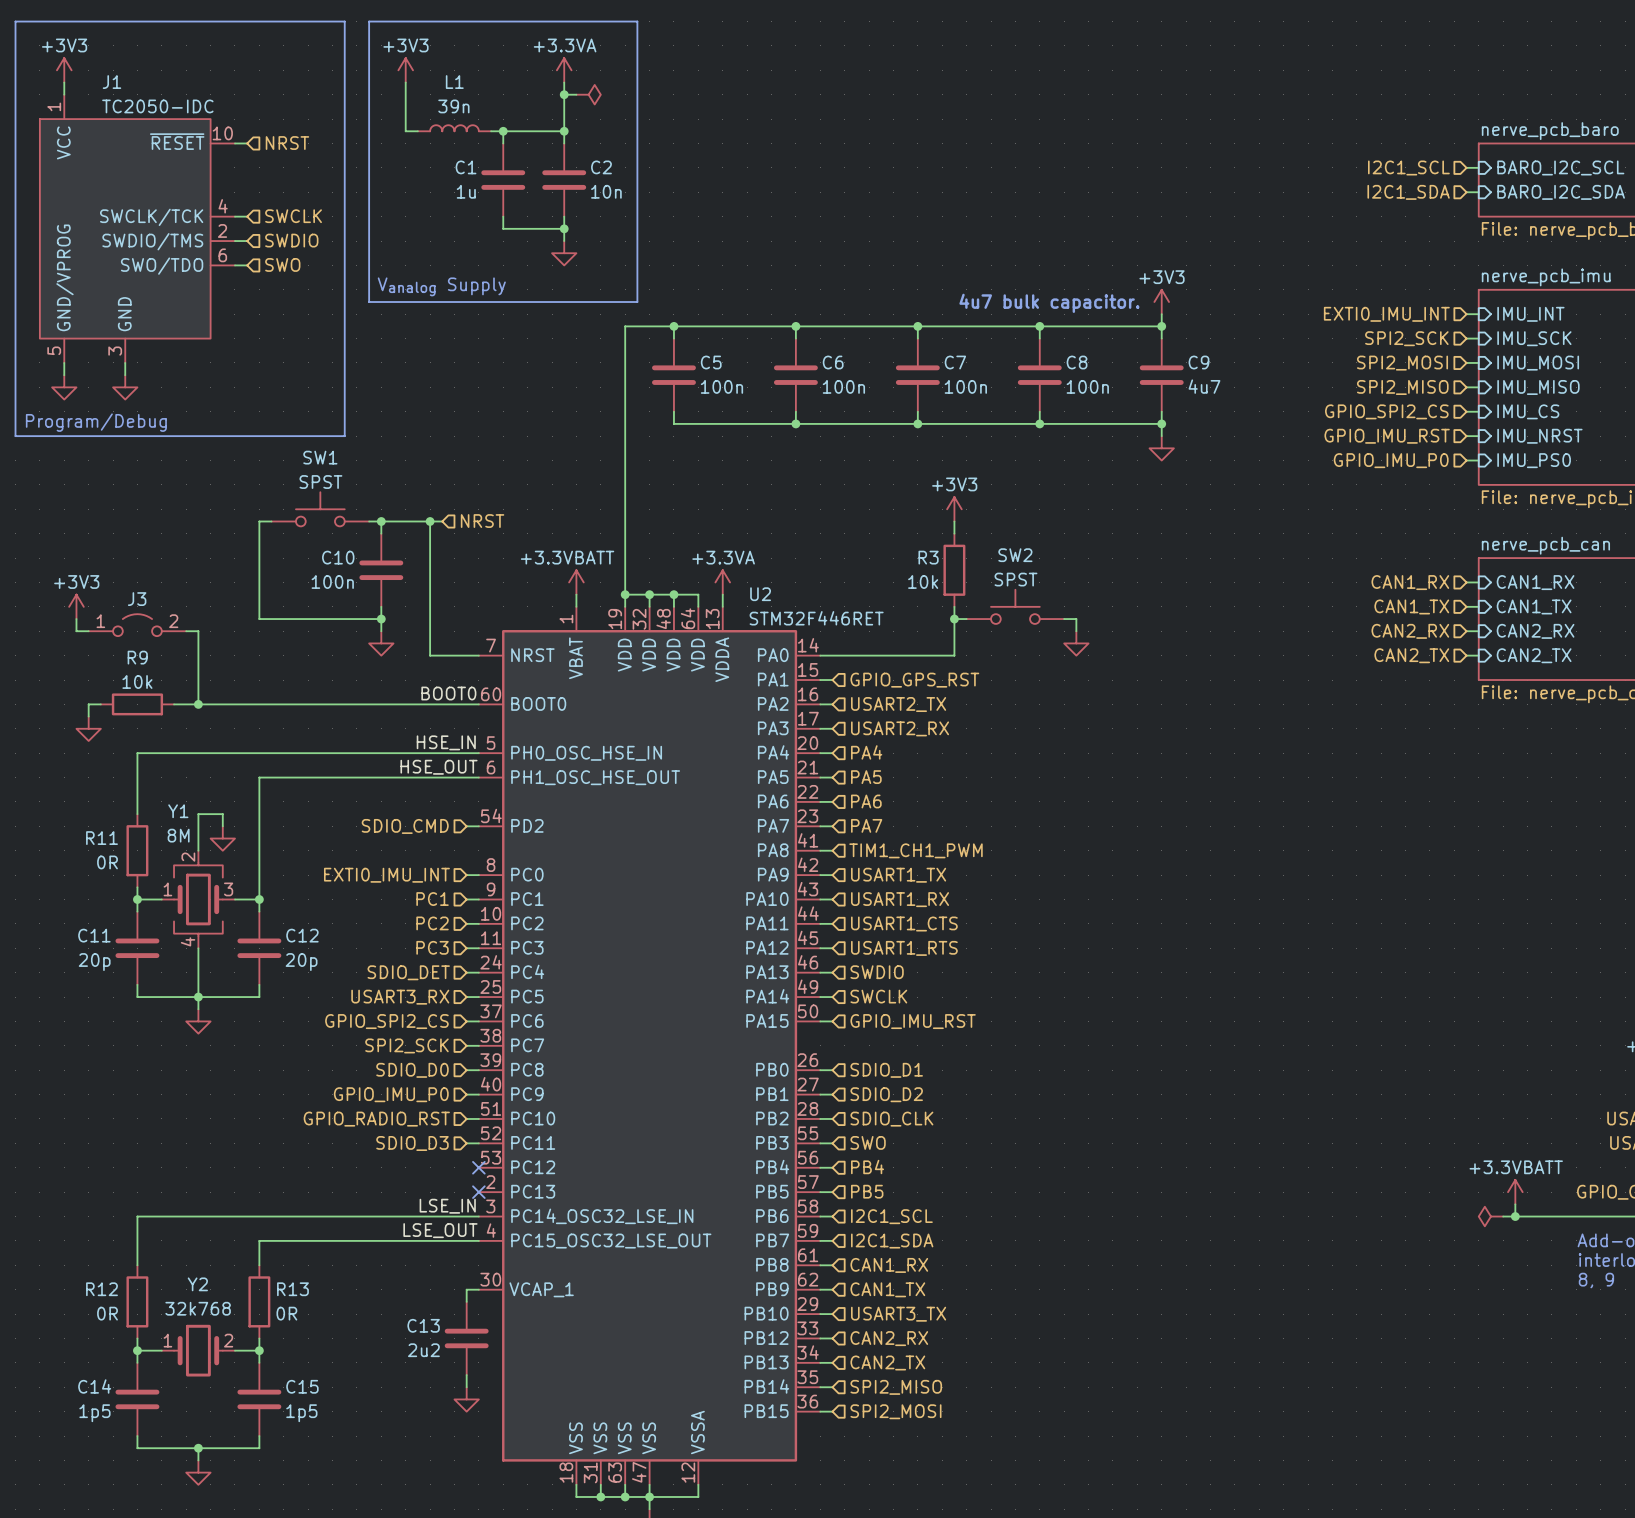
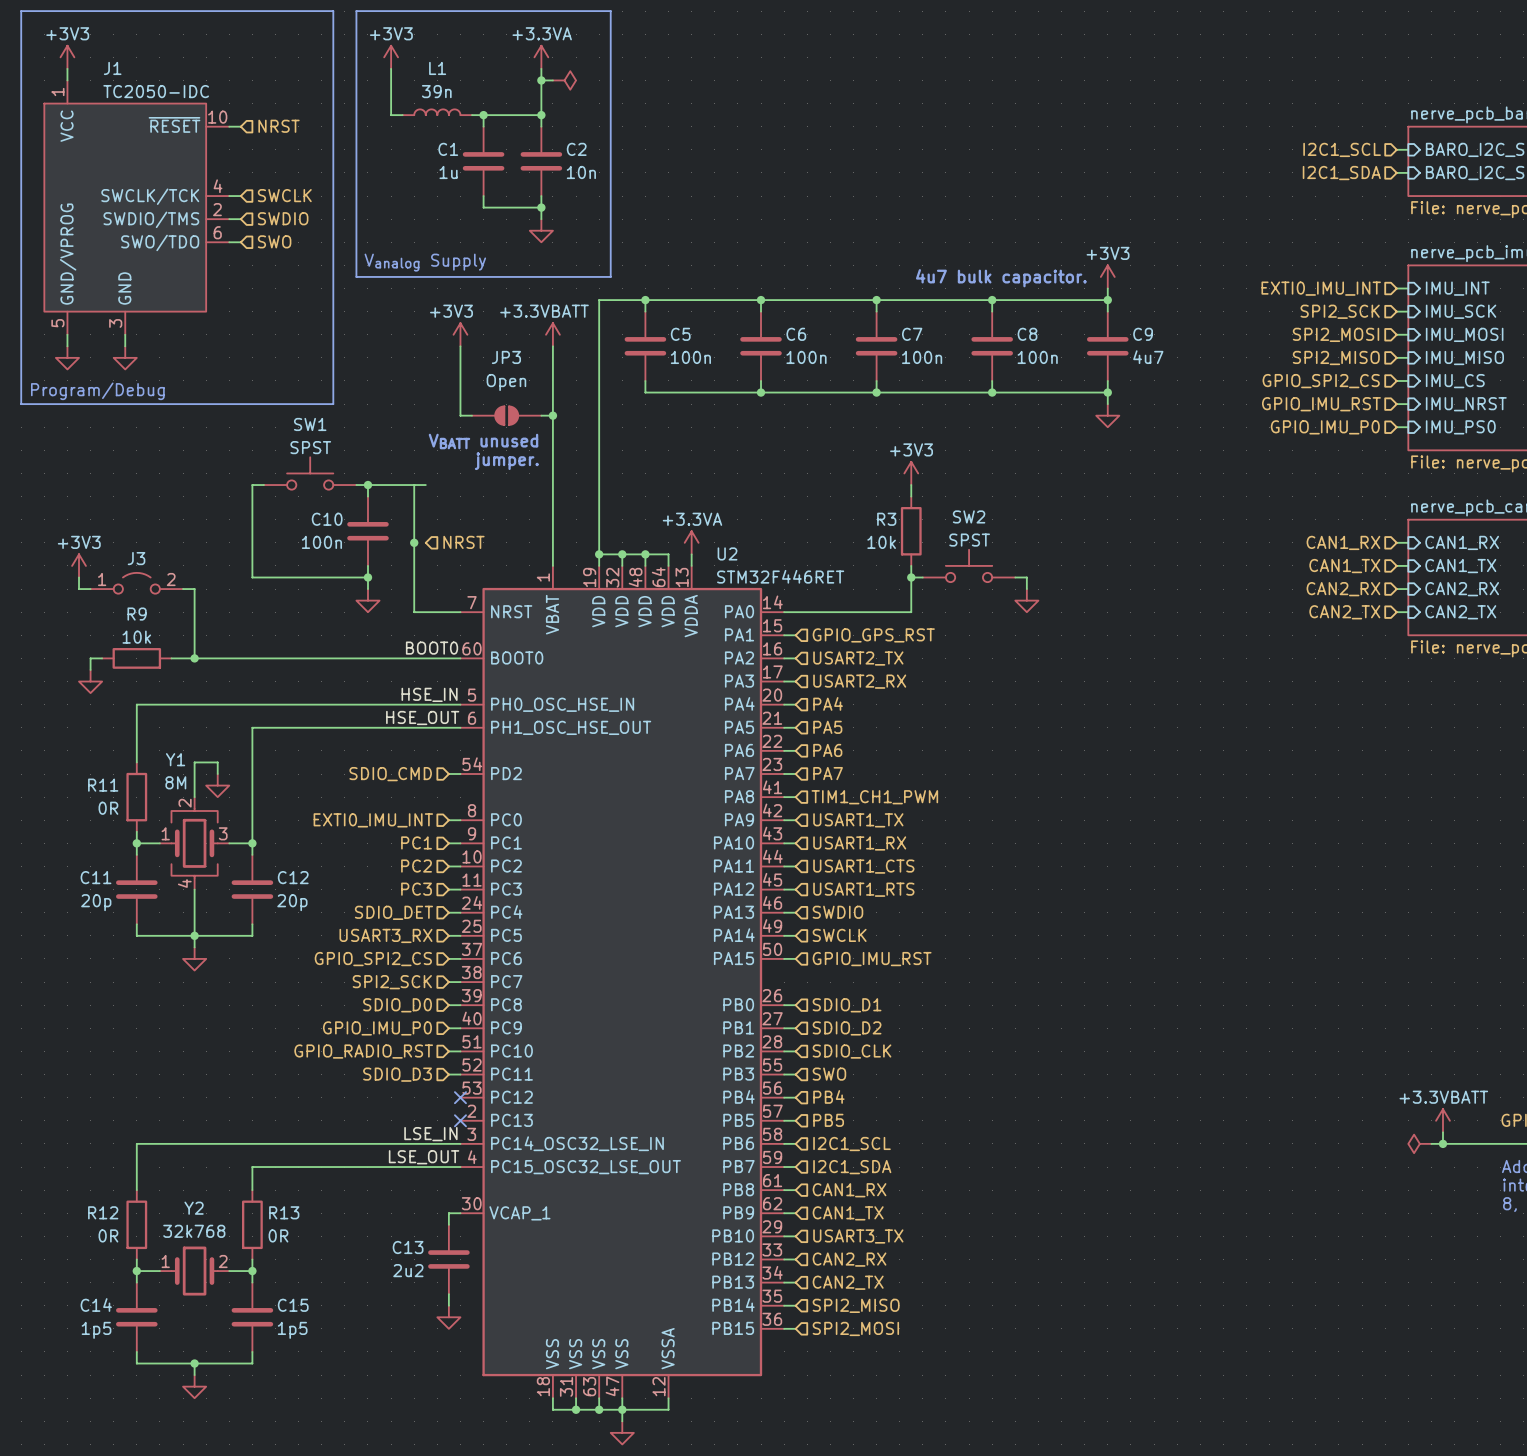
power symbol: none -> +3V3 (460, 334)
wire: none -> (460, 346) (460, 415) (472, 415)
wire: none -> (552, 346) (552, 554)
JP3: none -> Open (506, 415)
wire: none -> (541, 415) (552, 415)
junction: none -> (552, 415)
text: none -> VBATT unused (483, 441)
text: none -> jumper. (506, 461)
junction: (430, 521) -> none
hierarchical label position: NRST (482, 521) -> NRST (463, 542)
junction: none -> (414, 542)
power symbol position: +3.3VBATT (576, 582) -> +3.3VBATT (552, 334)

